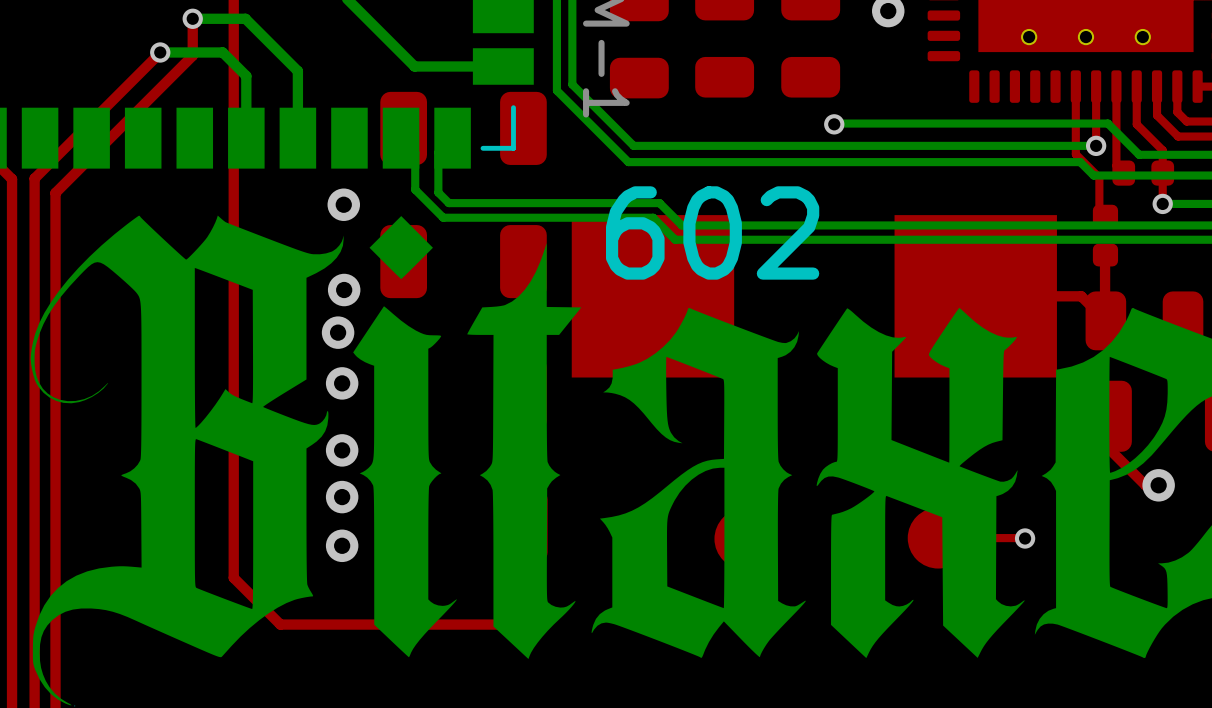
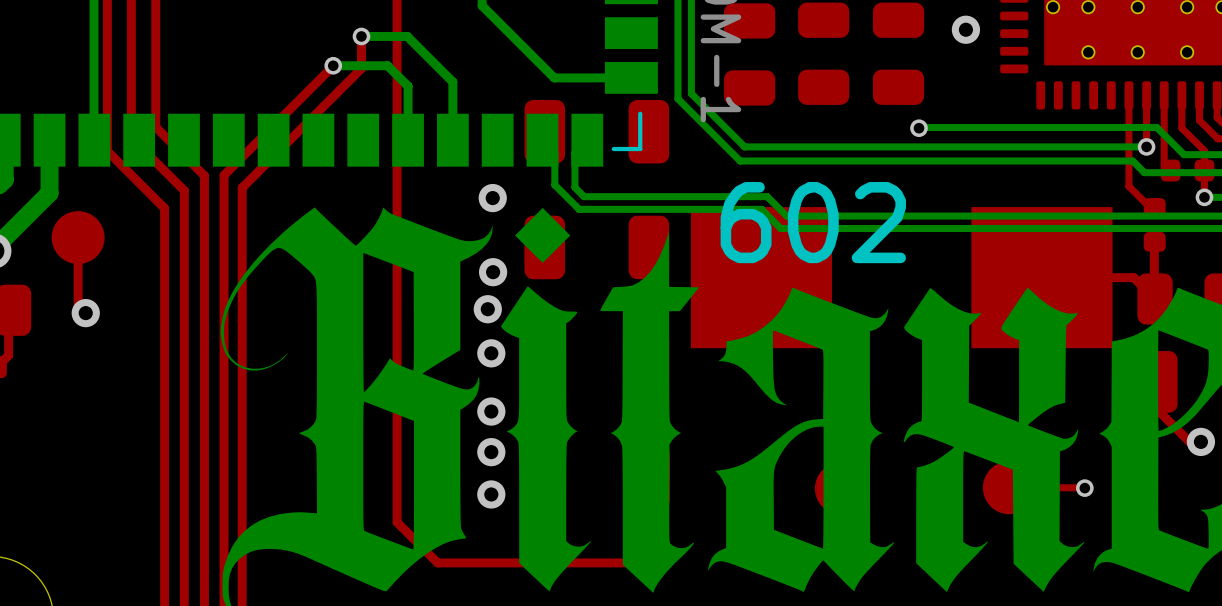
top track: (1075, 154) (1099, 177) (1099, 214) -> (1128, 154) (1128, 186) (1149, 206)

